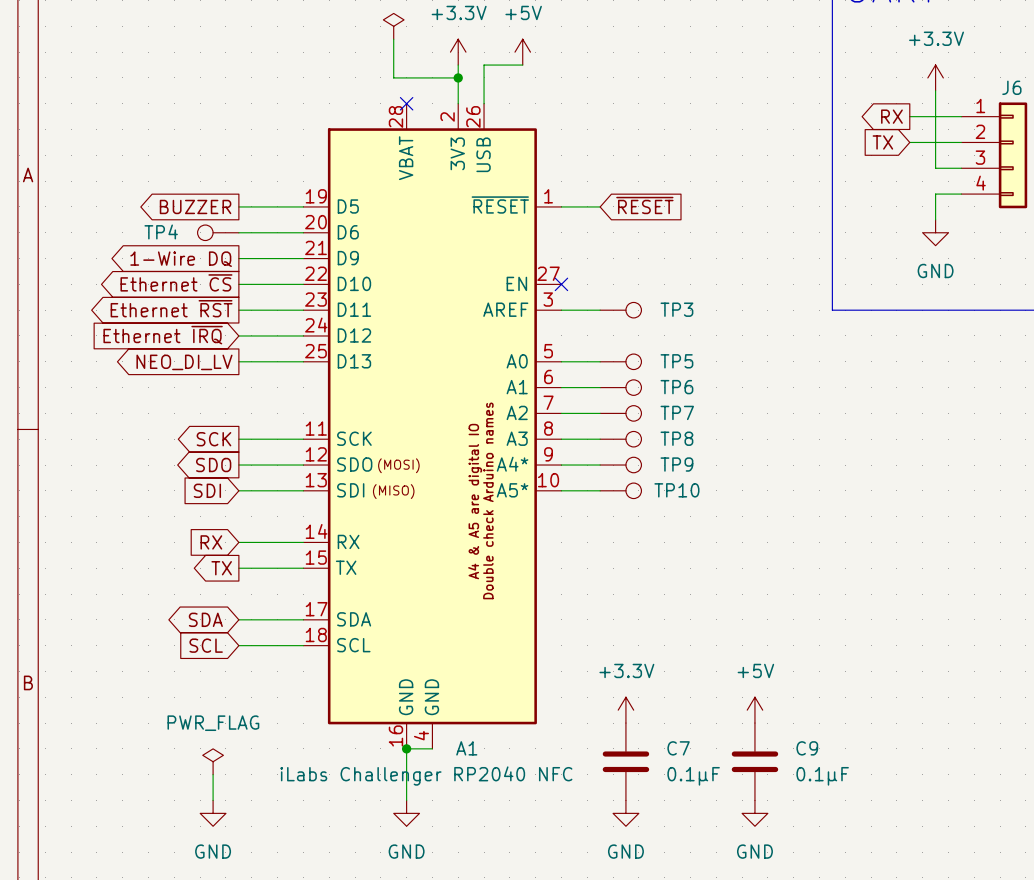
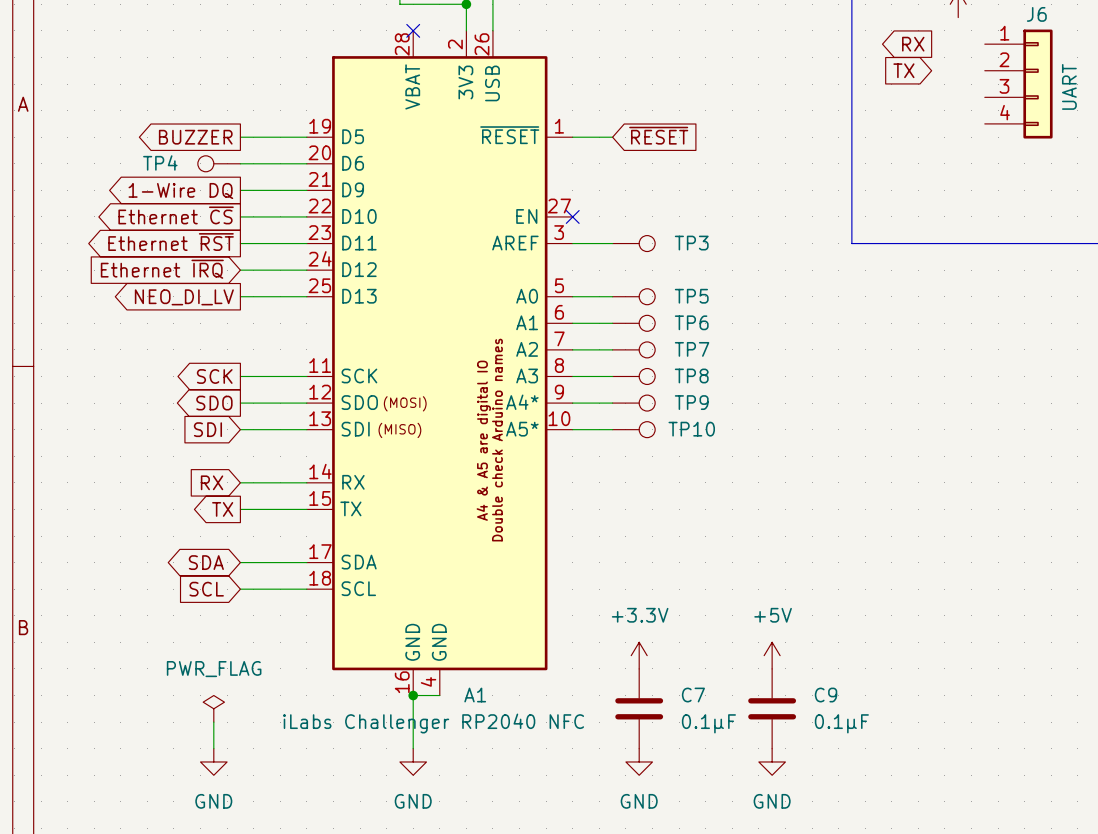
wire: (935, 90) (935, 168) (961, 168) -> none
wire: (909, 116) (961, 116) -> none
wire: (909, 142) (961, 142) -> none
wire: (961, 194) (935, 194) (935, 219) -> none
power symbol: GND (935, 232) -> none

